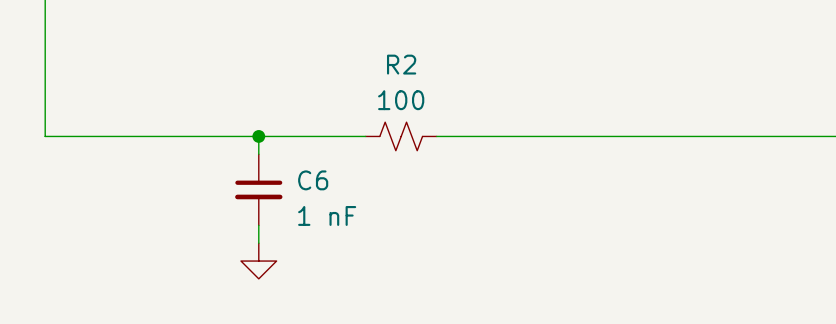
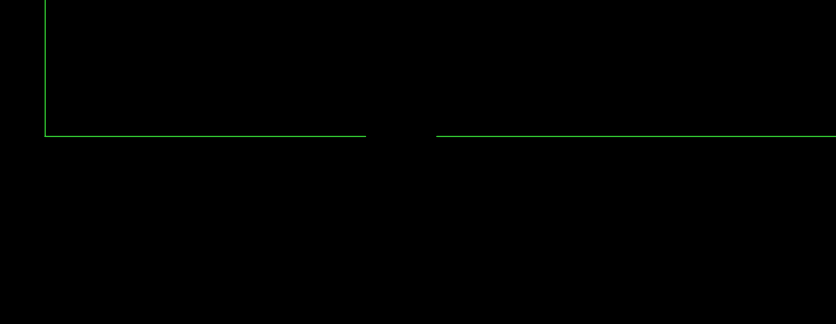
wire: (258, 136) (258, 154) -> none
junction: (258, 136) -> none
R2: 100 (401, 136) -> none
C6: 1 nF (258, 189) -> none
wire: (258, 225) (258, 243) -> none
power symbol: (258, 261) -> none

